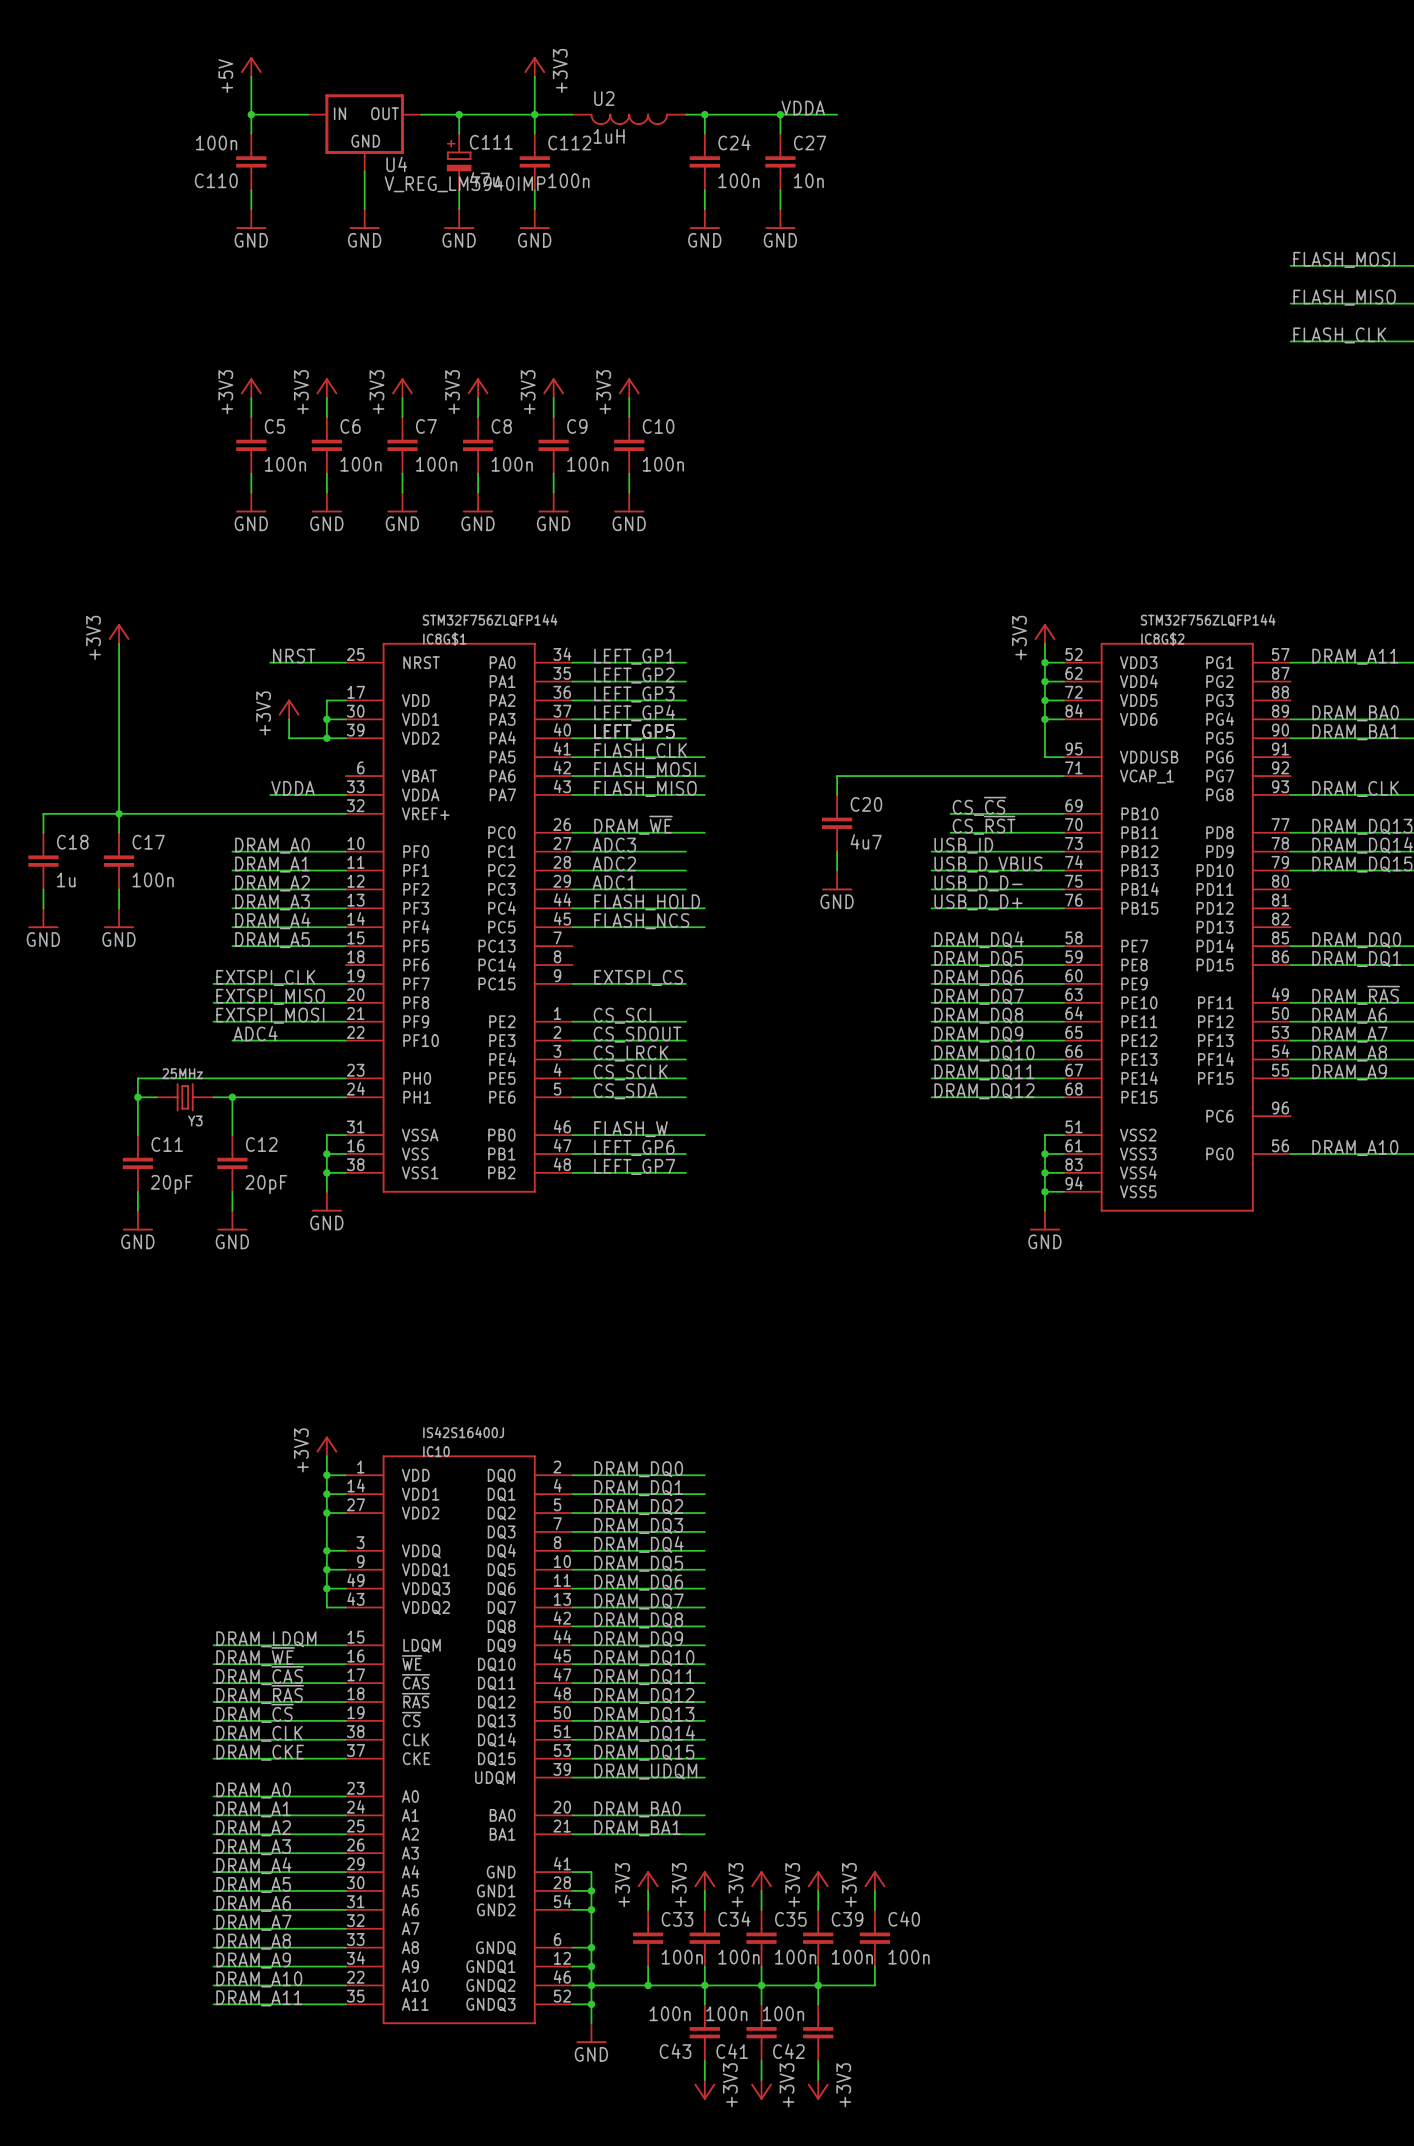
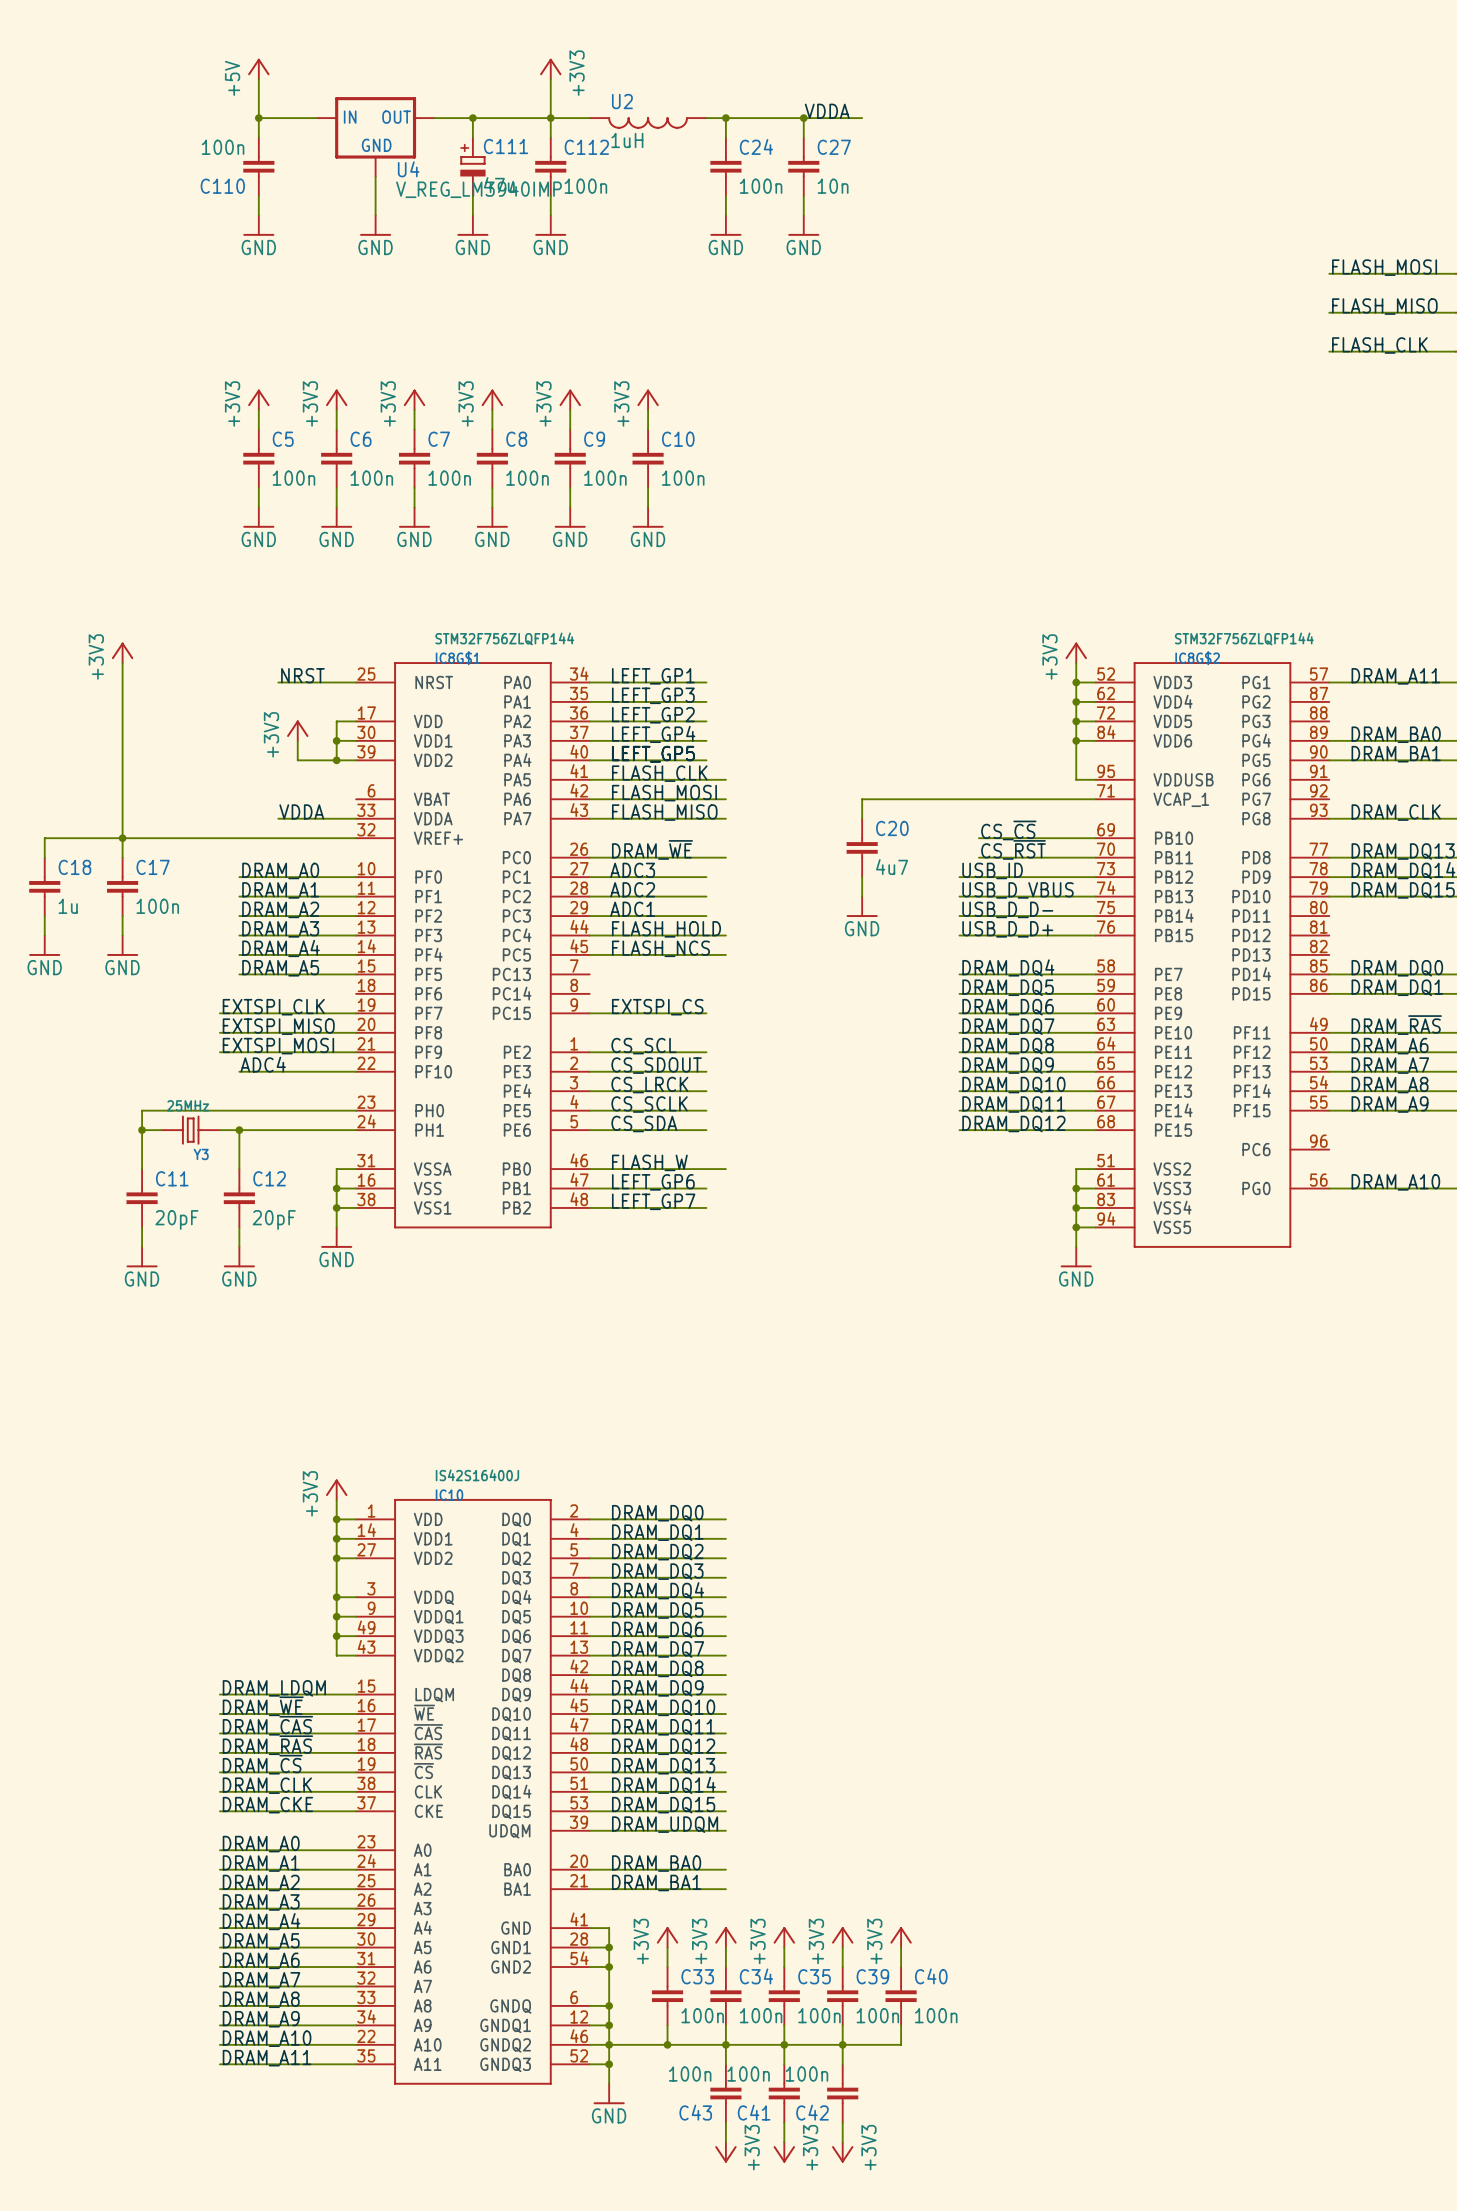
label: LEFT_GP2 (634, 675) -> LEFT_GP3 (653, 695)
label: LEFT_GP3 (634, 694) -> LEFT_GP2 (653, 715)

